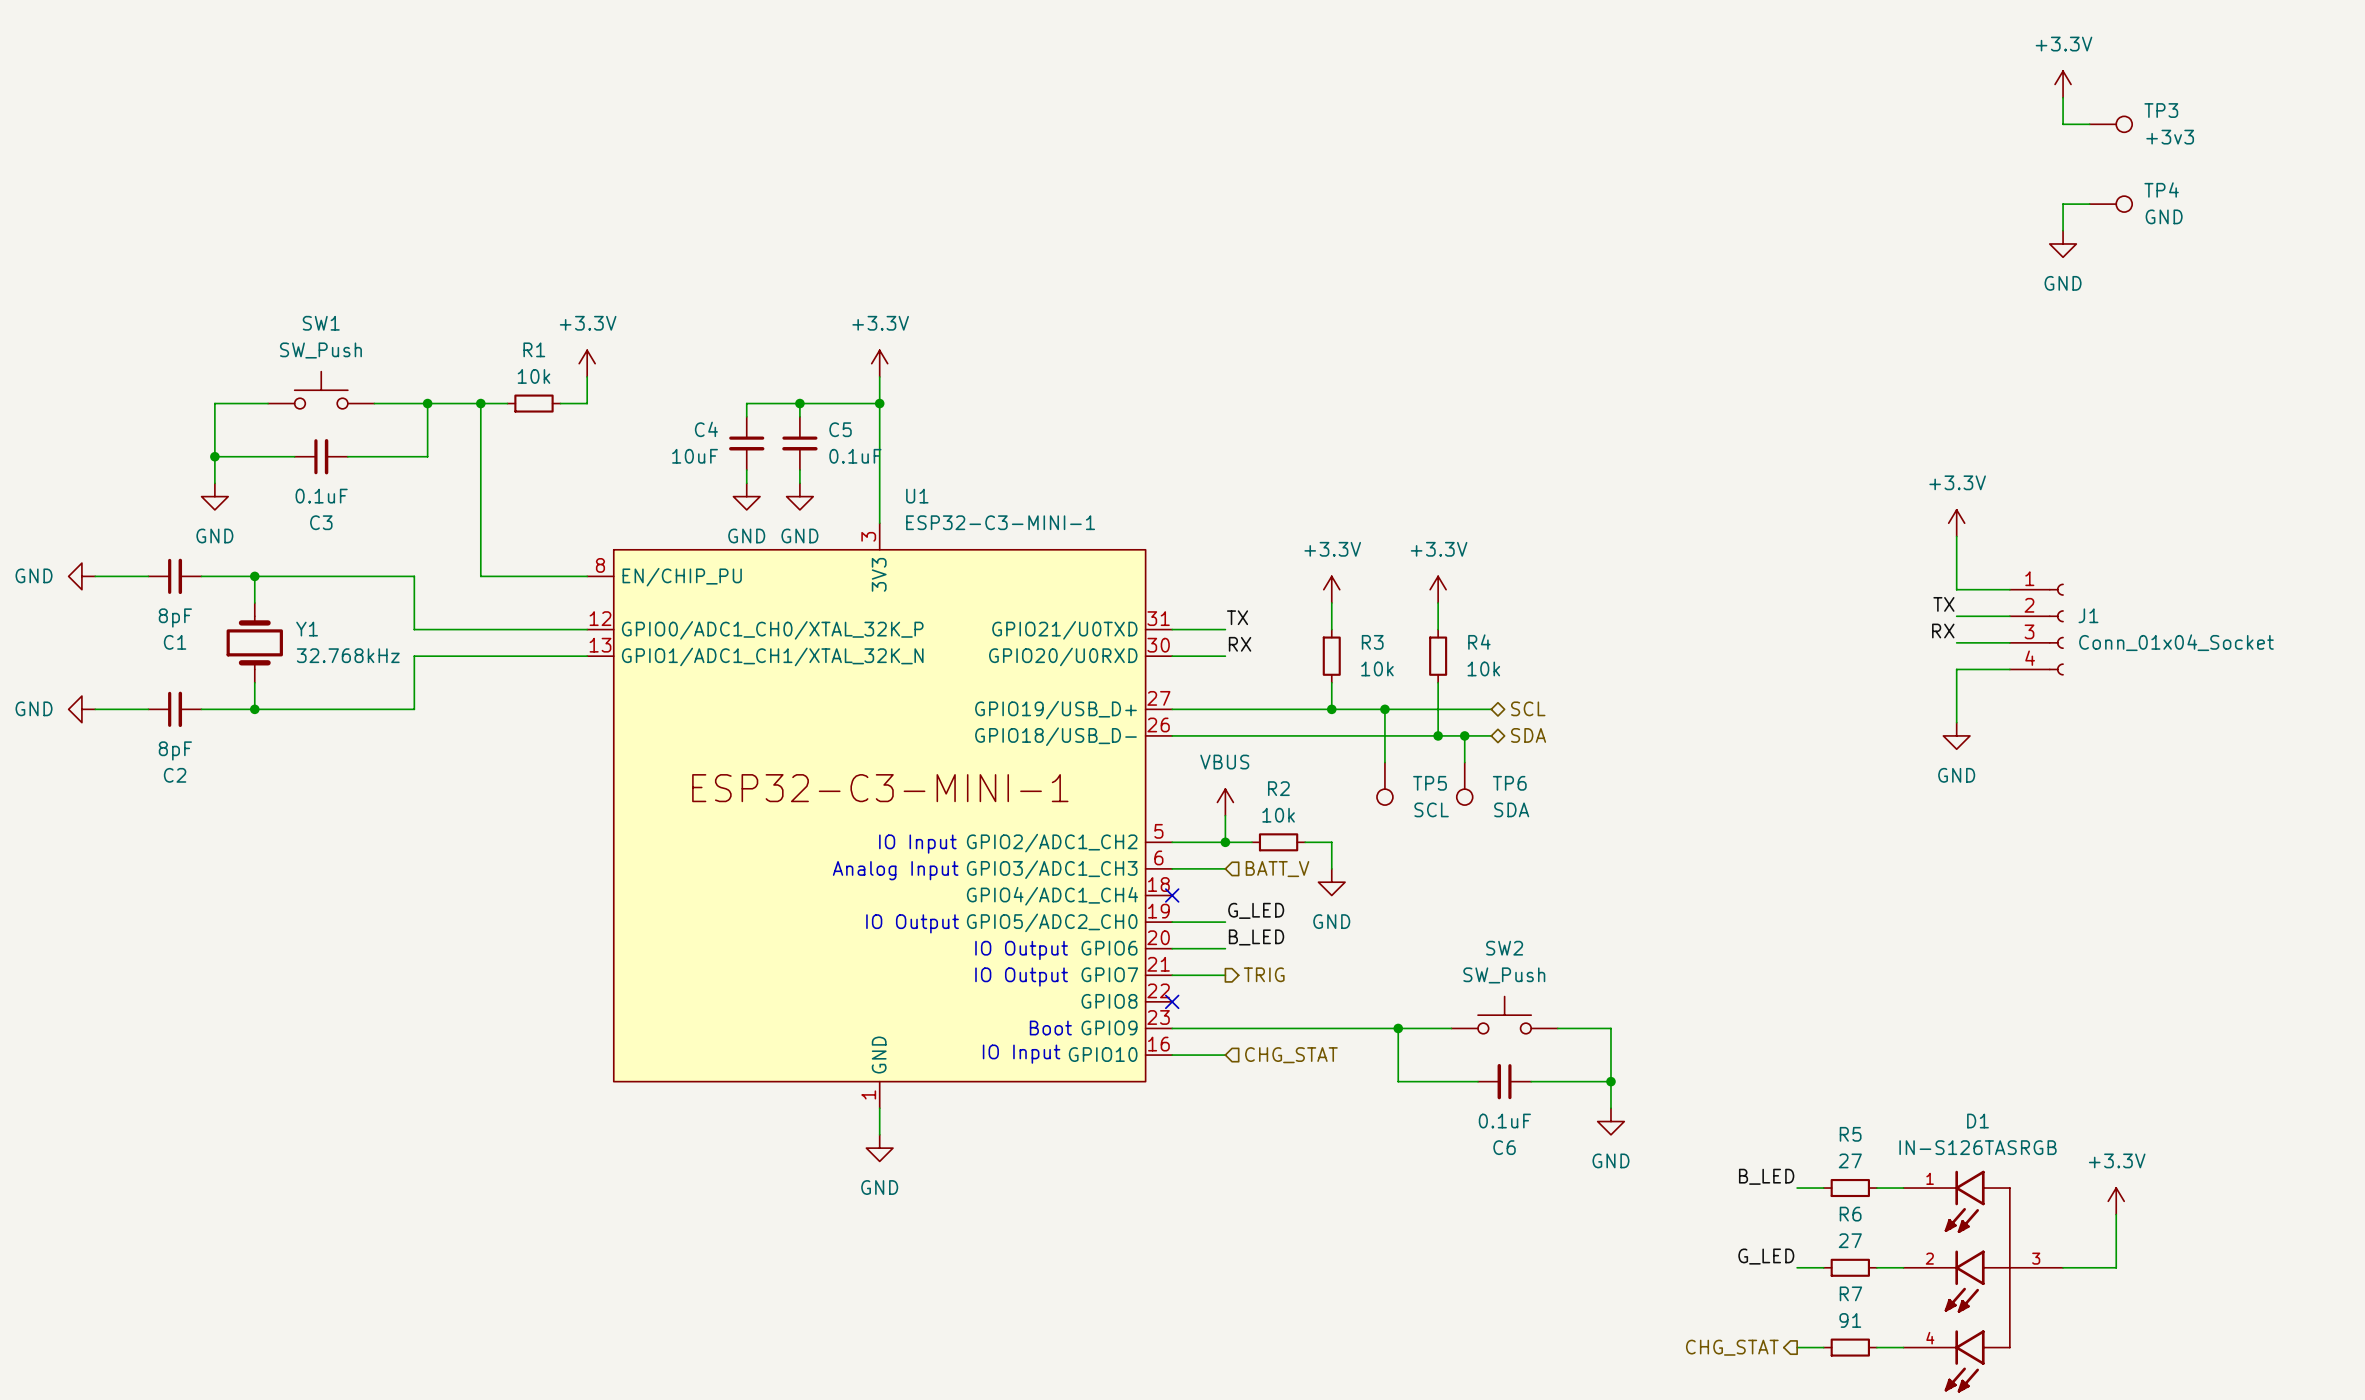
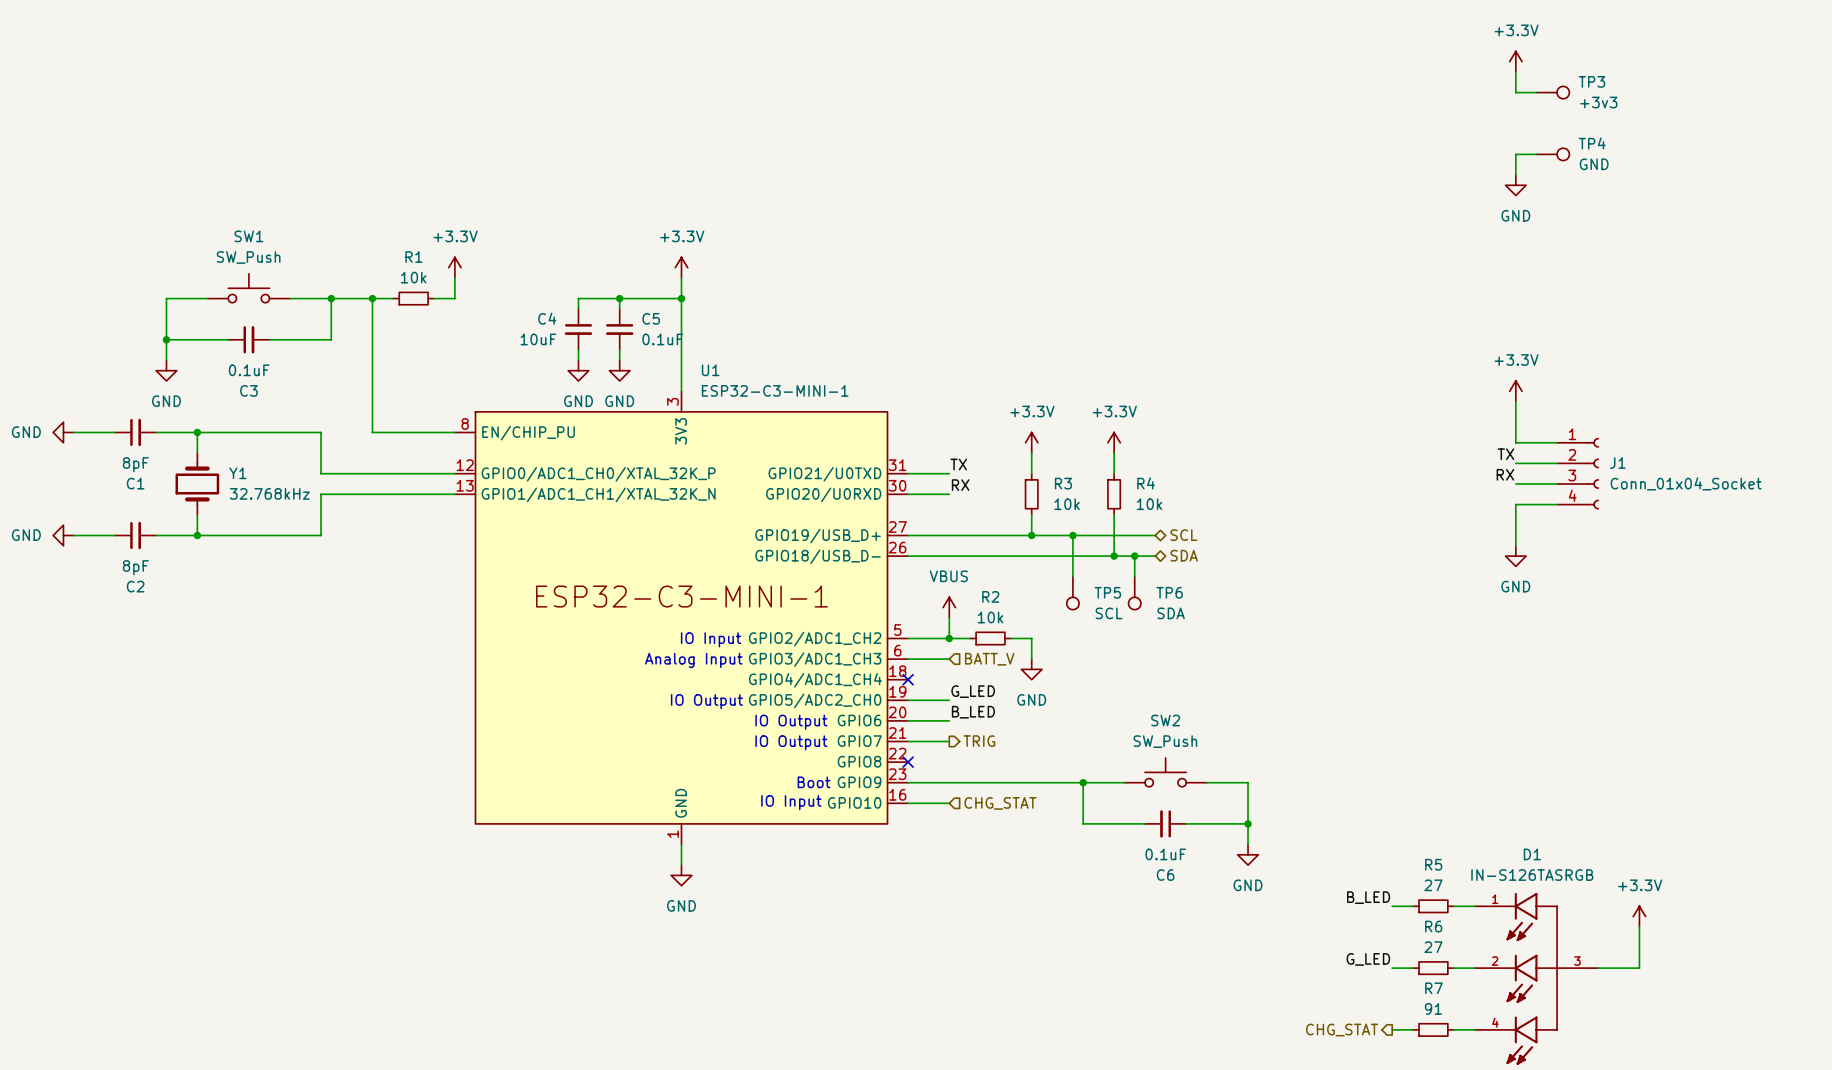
power symbol position: +3.3V (2063, 84) -> +3.3V (1515, 61)
wire: (2063, 97) (2063, 124) (2089, 124) -> (1515, 71) (1515, 92) (1536, 92)
TP3 position: (2110, 124) -> (1552, 92)
wire: (2089, 204) (2063, 204) (2063, 230) -> (1536, 154) (1515, 154) (1515, 174)
TP4 position: (2110, 204) -> (1552, 154)
power symbol position: GND (2063, 243) -> GND (1515, 185)

